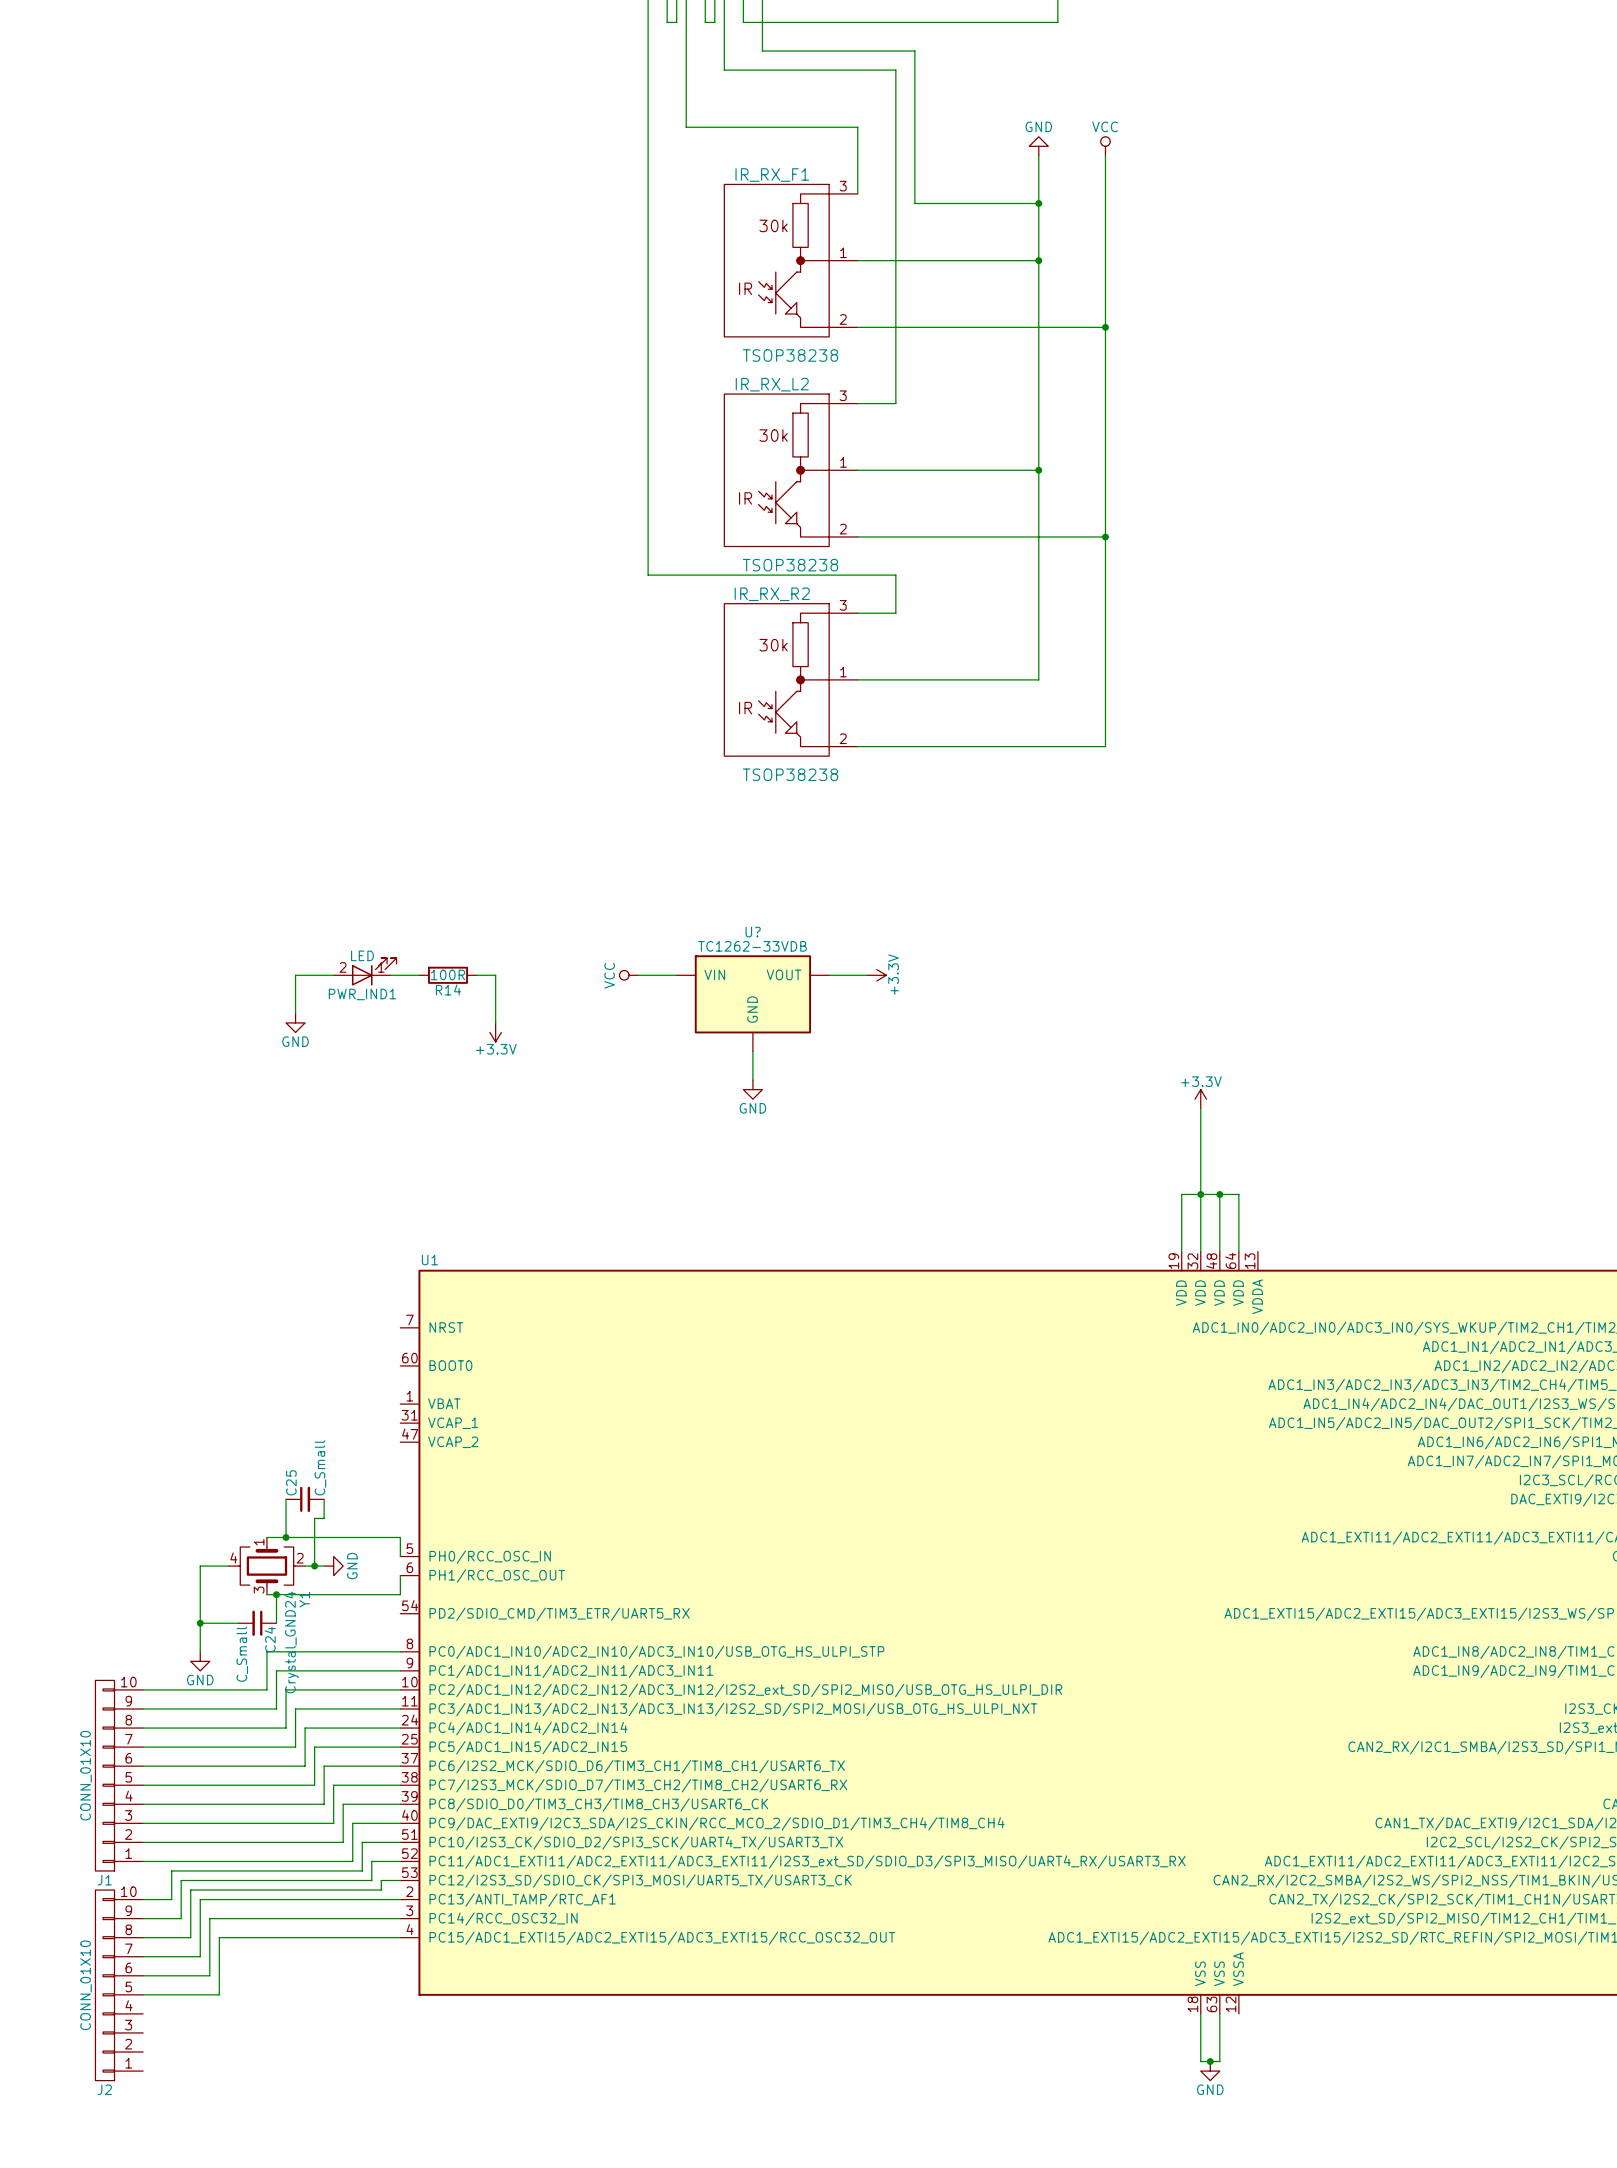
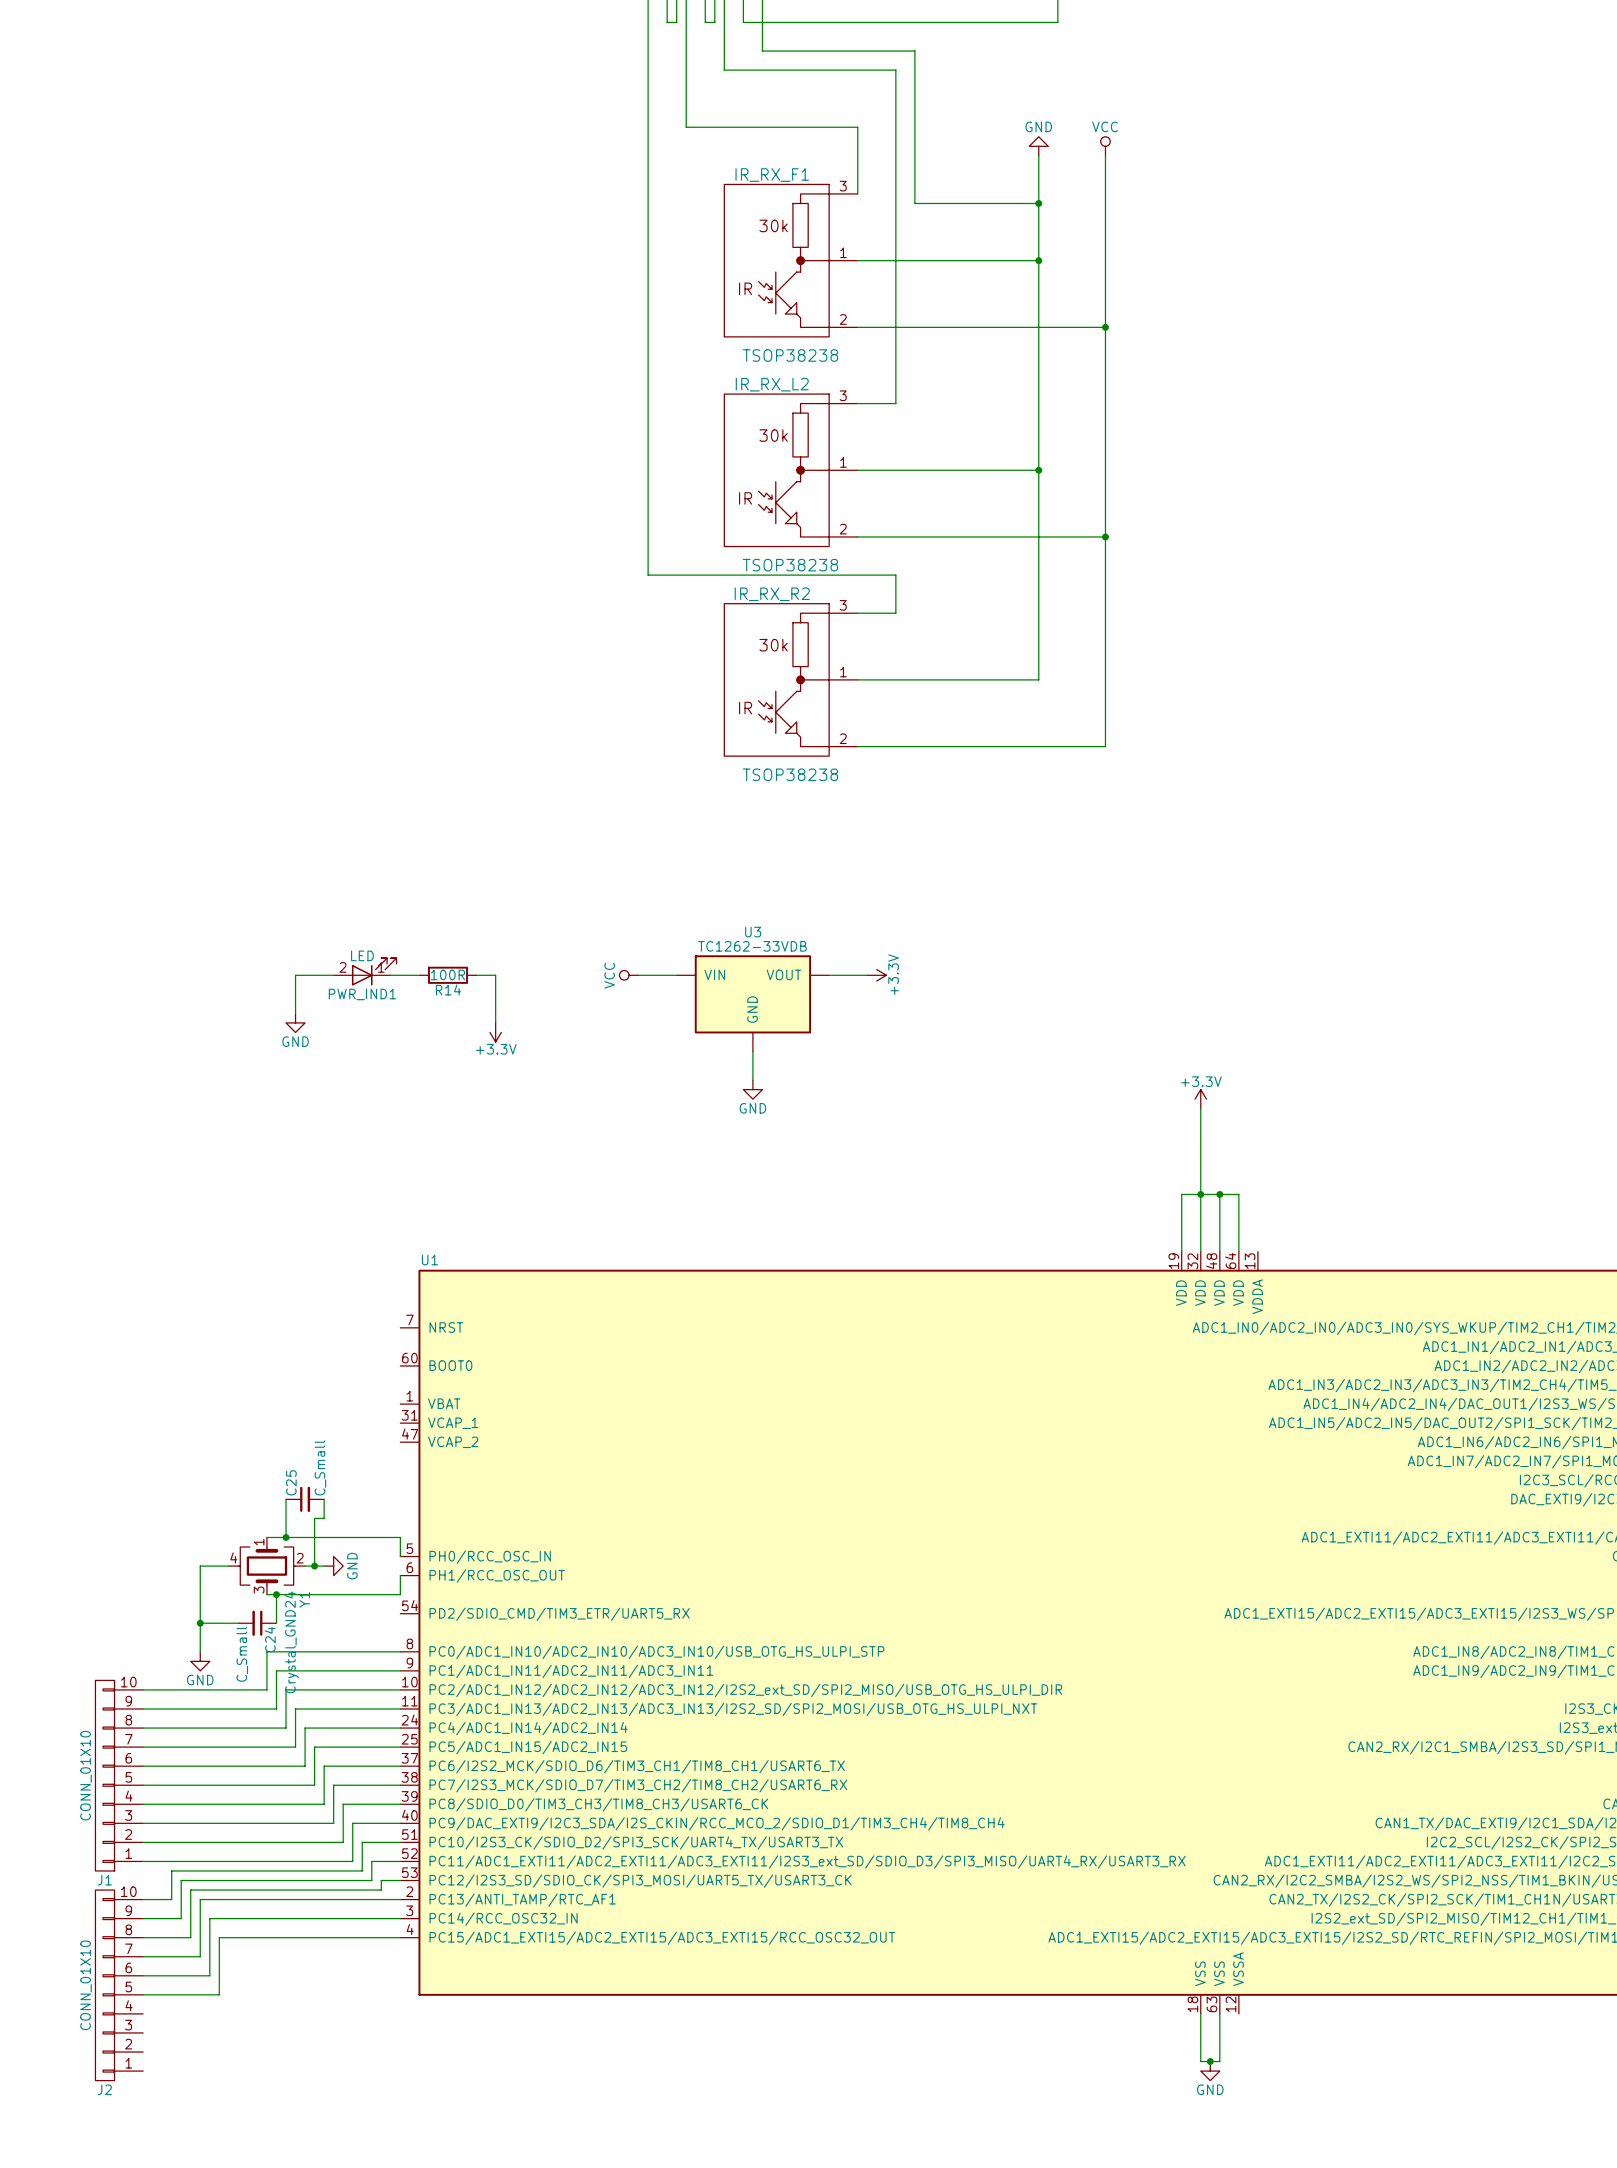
U? name: U? (753, 932) -> U3 (753, 932)

